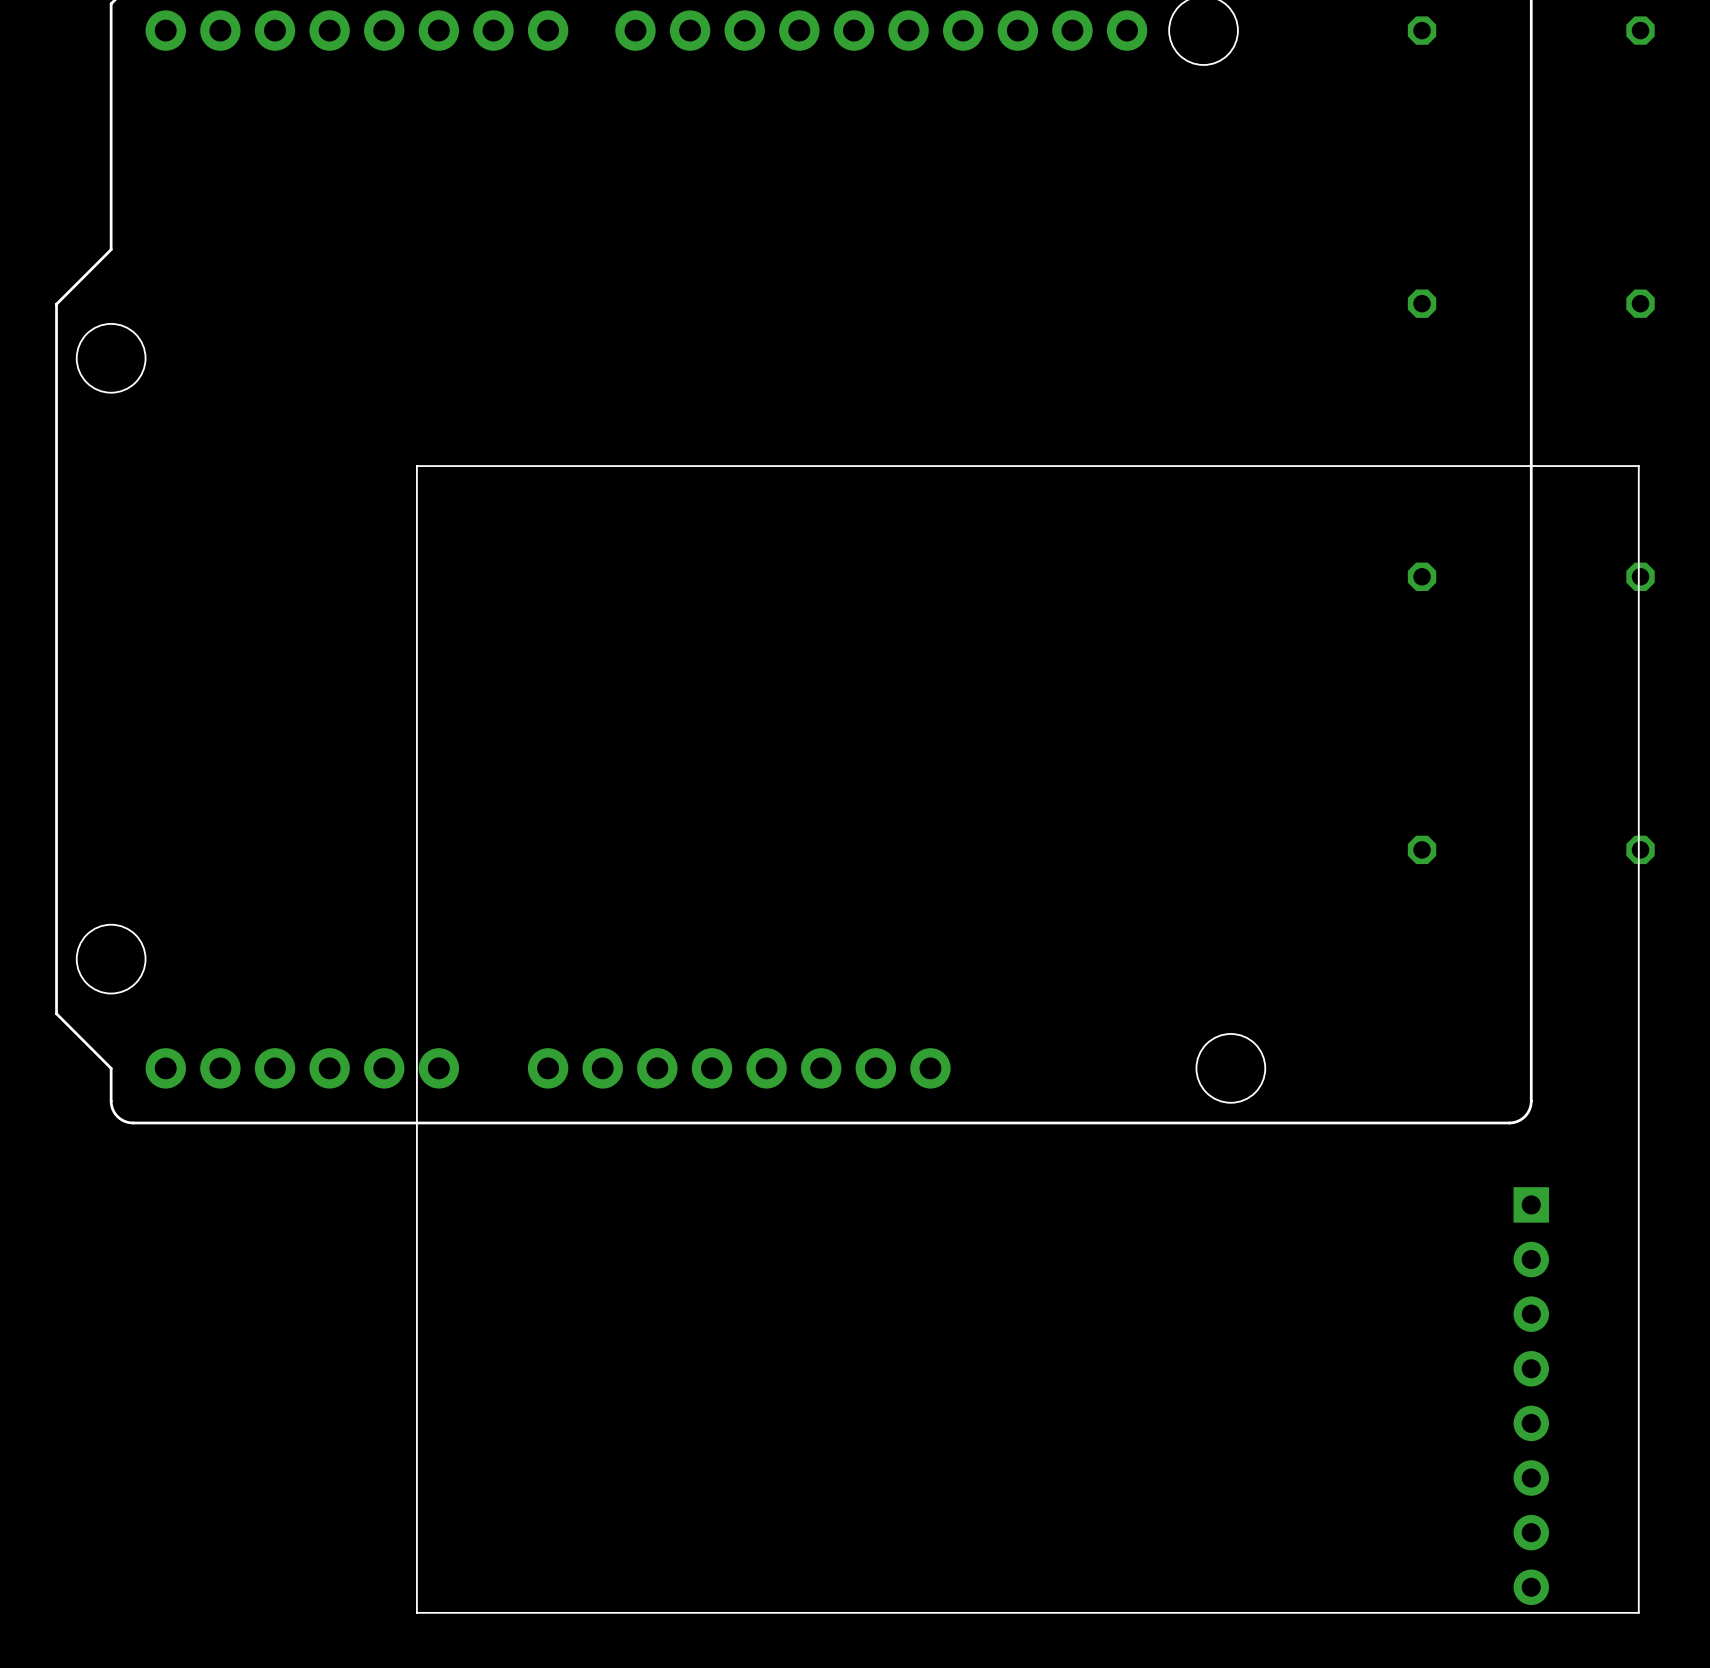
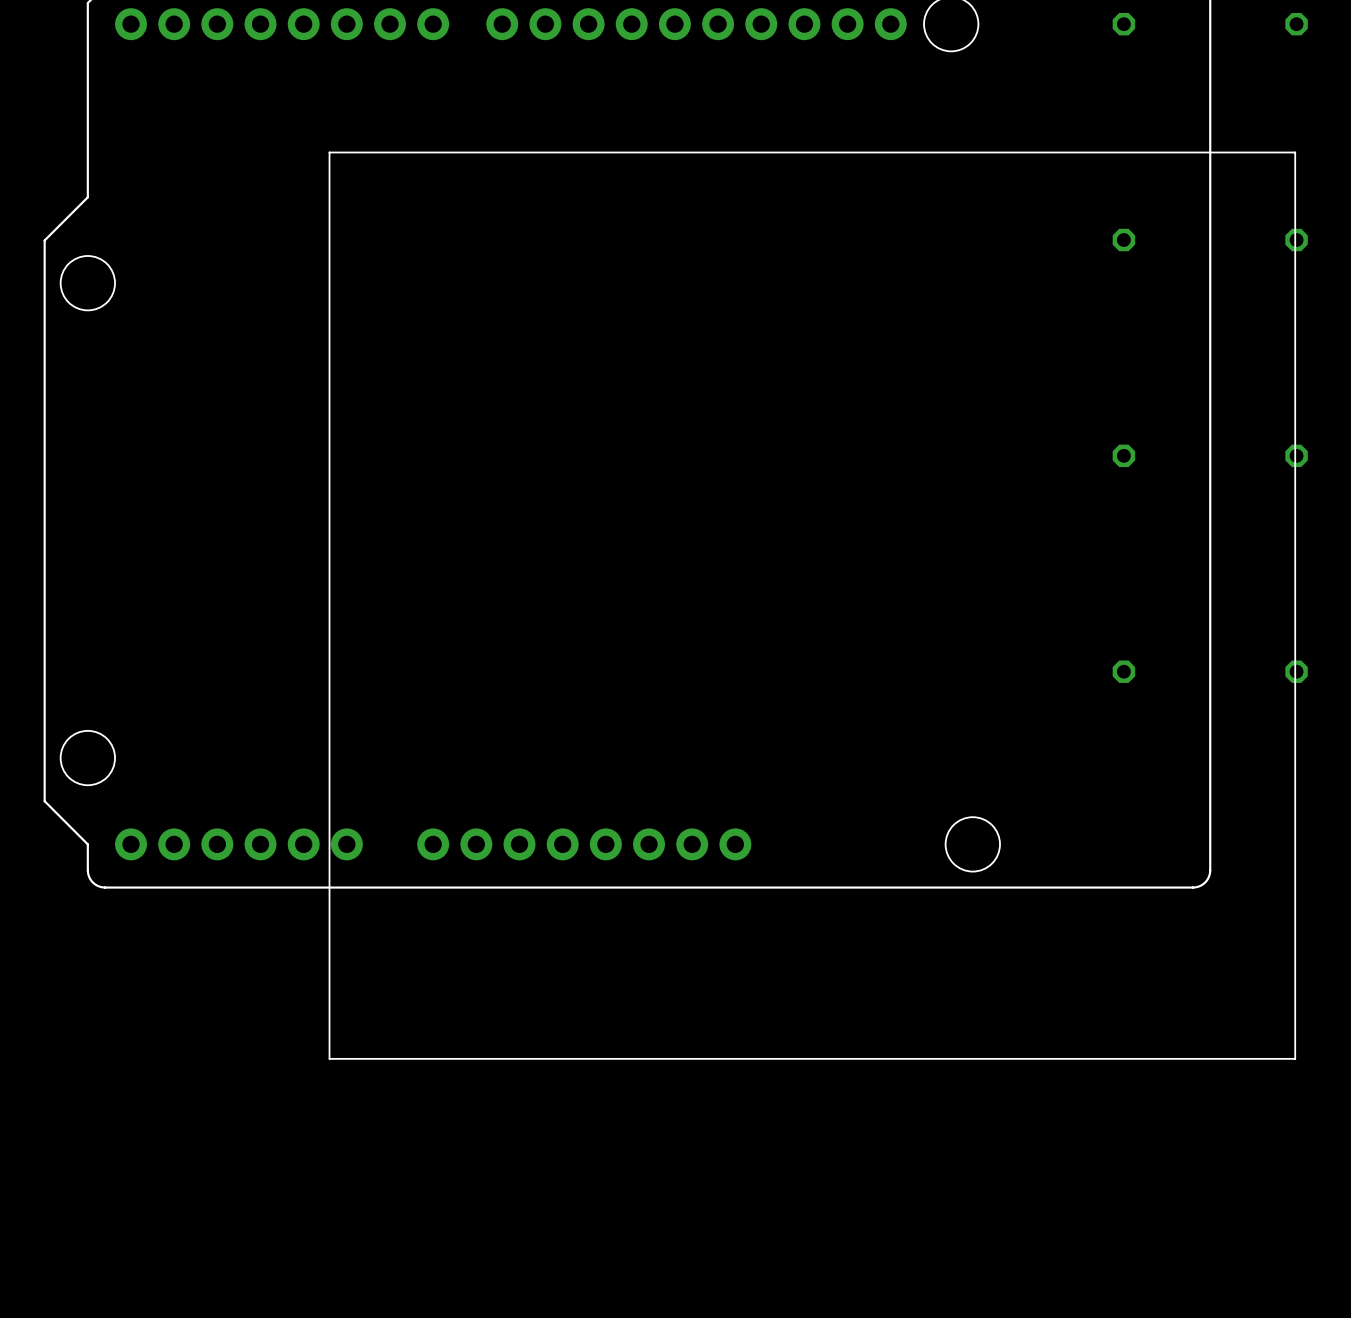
board edge: (1638, 466) (416, 466) -> (1295, 368) (1295, 152) (329, 152) (329, 368)
board edge: (1638, 1339) (1638, 1612) (416, 1612) (416, 1339) -> (1295, 1058) (329, 1058)
part: (1531, 1396) -> none

